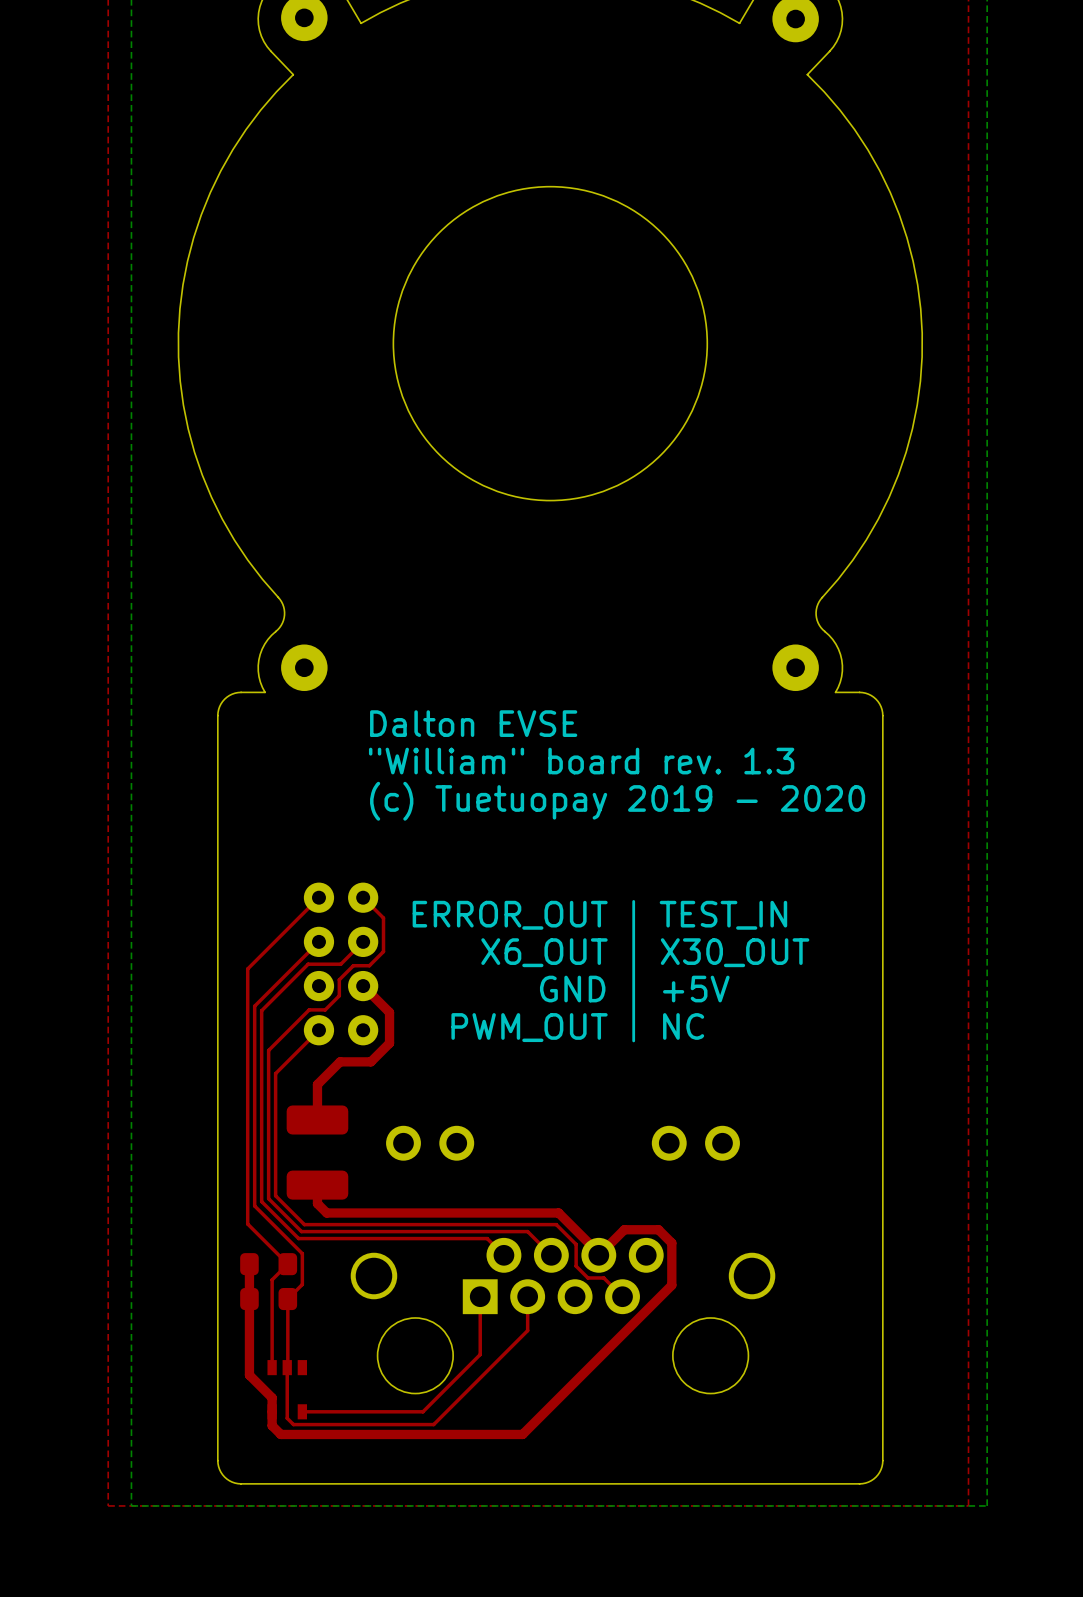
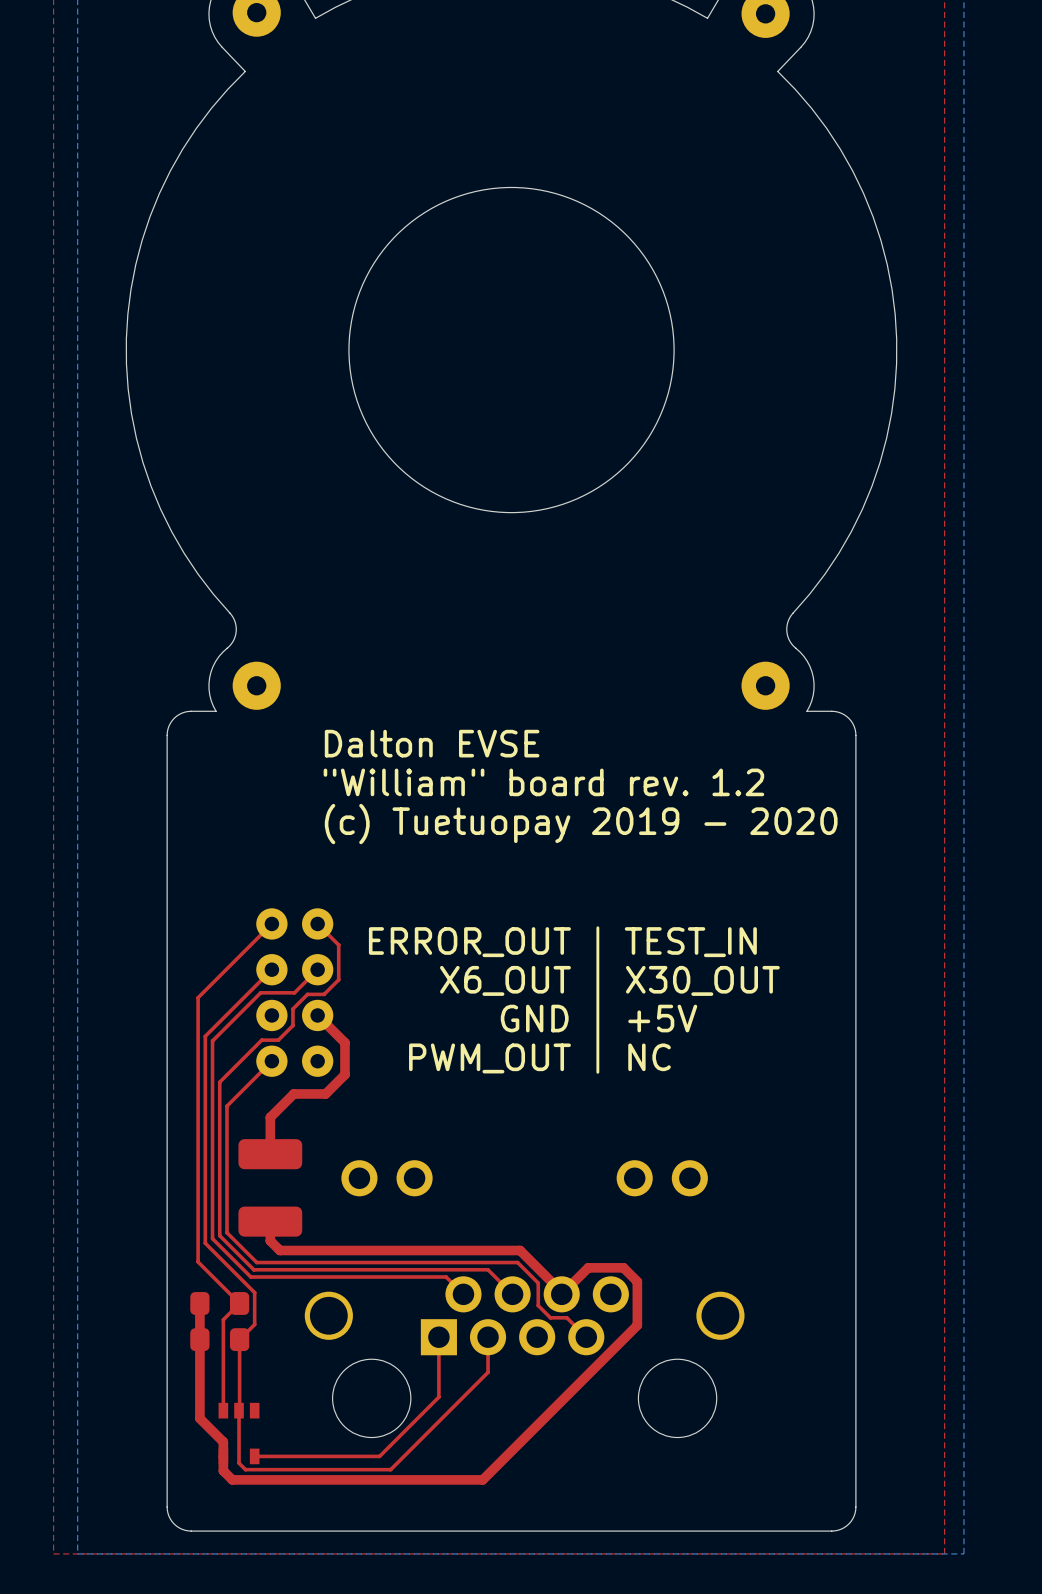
text: "William" board rev. 1.3 (581, 761) -> "William" board rev. 1.2 (543, 782)

